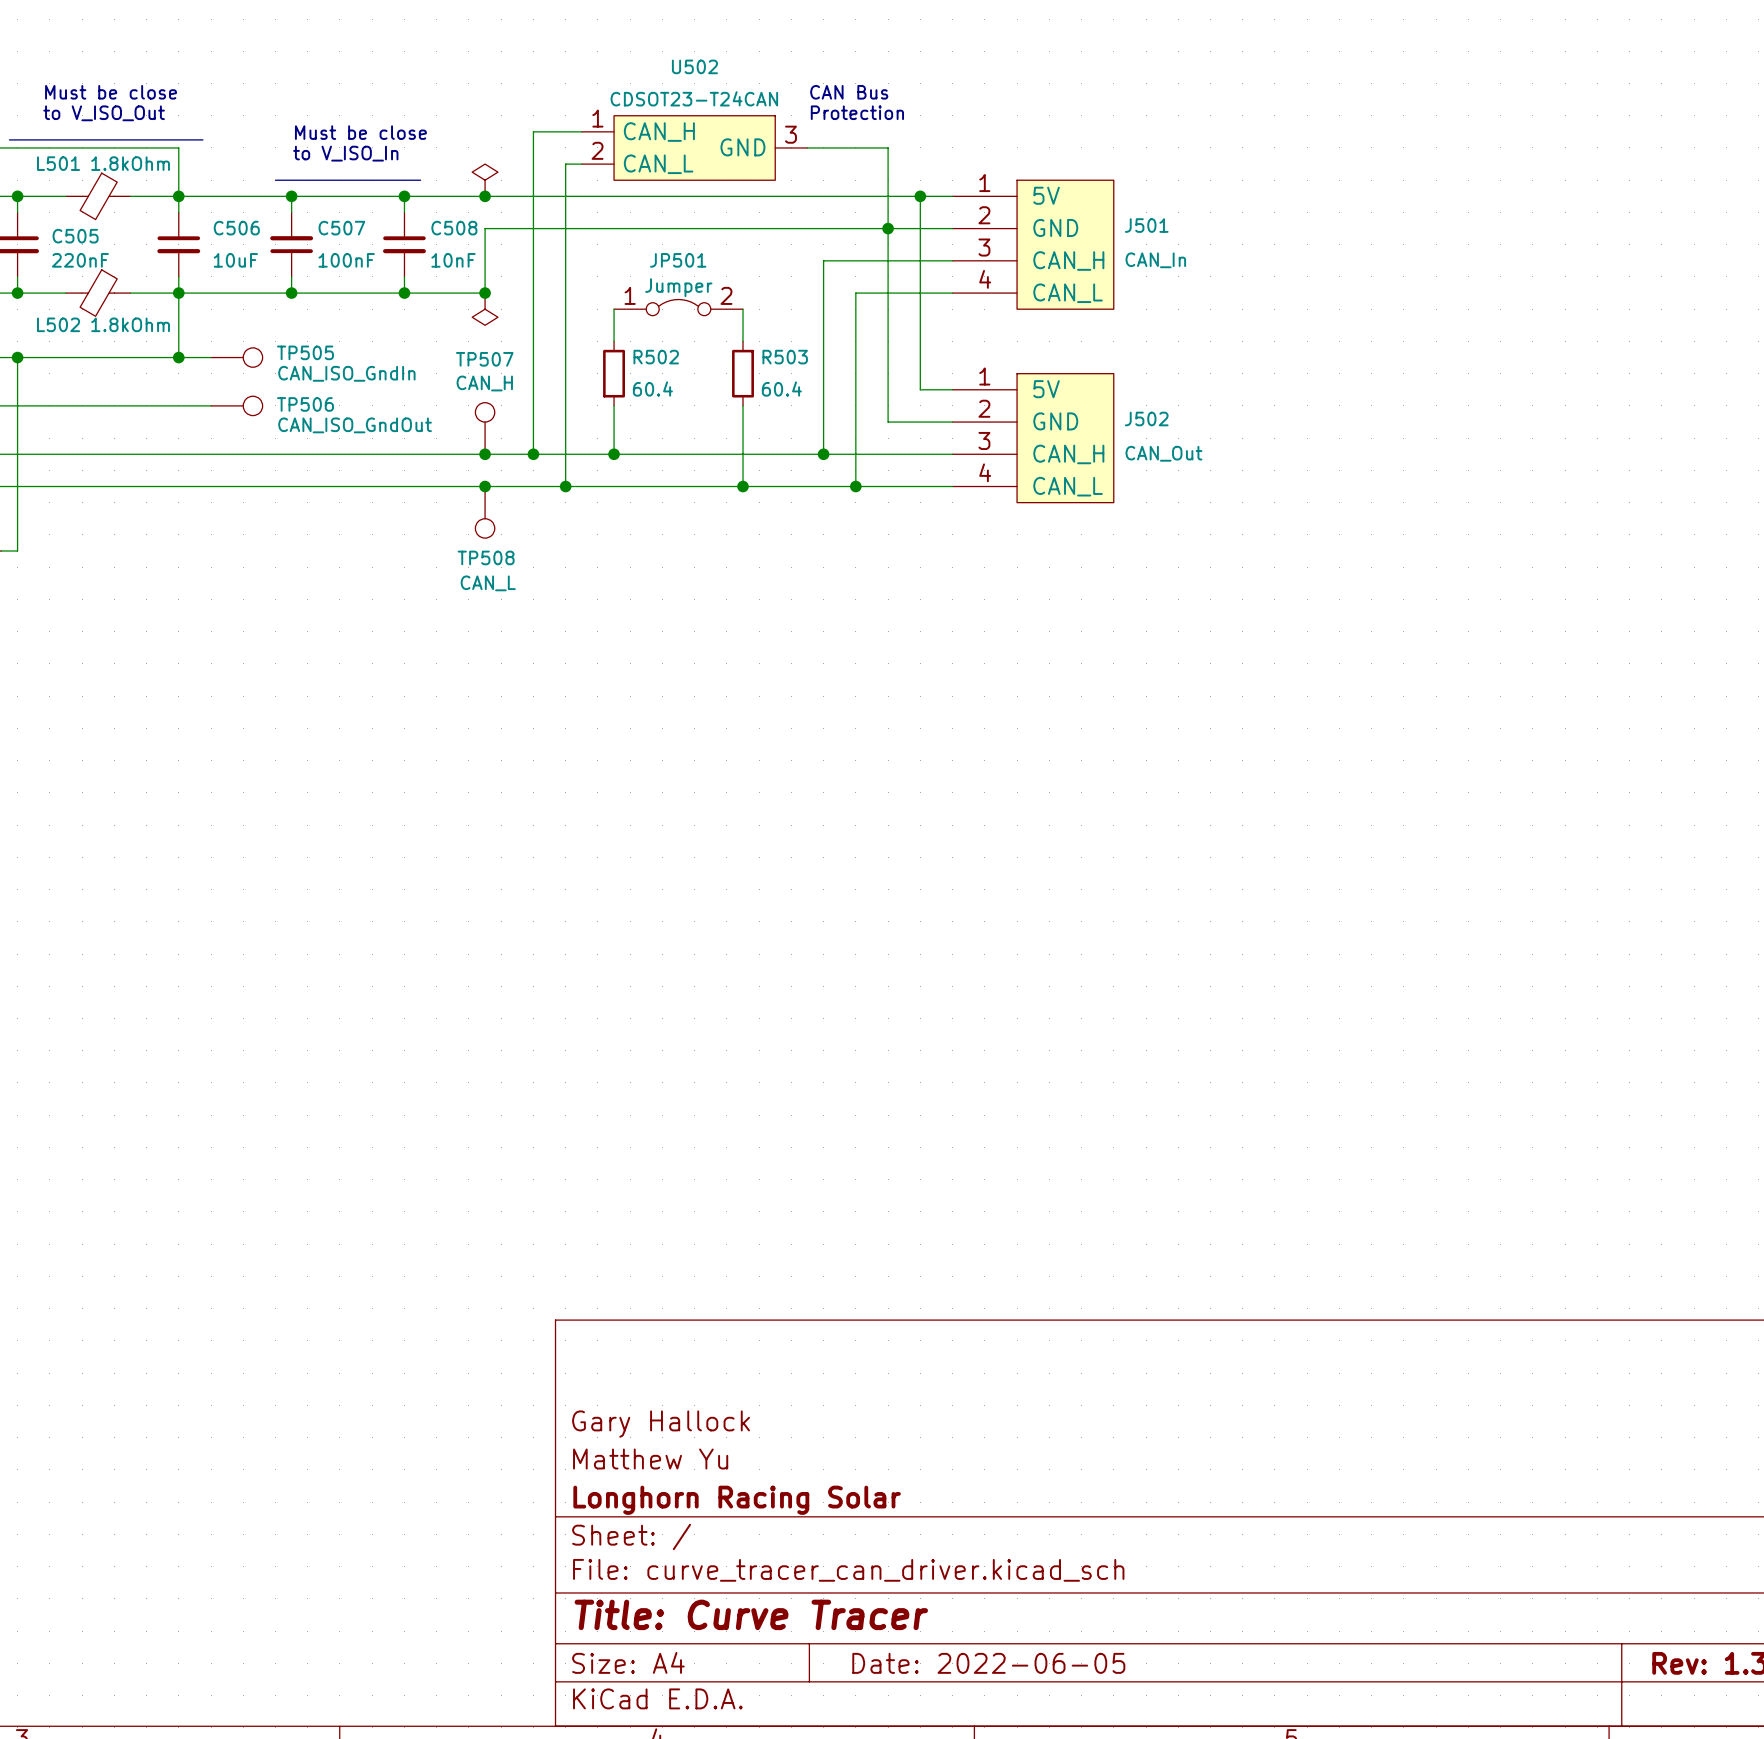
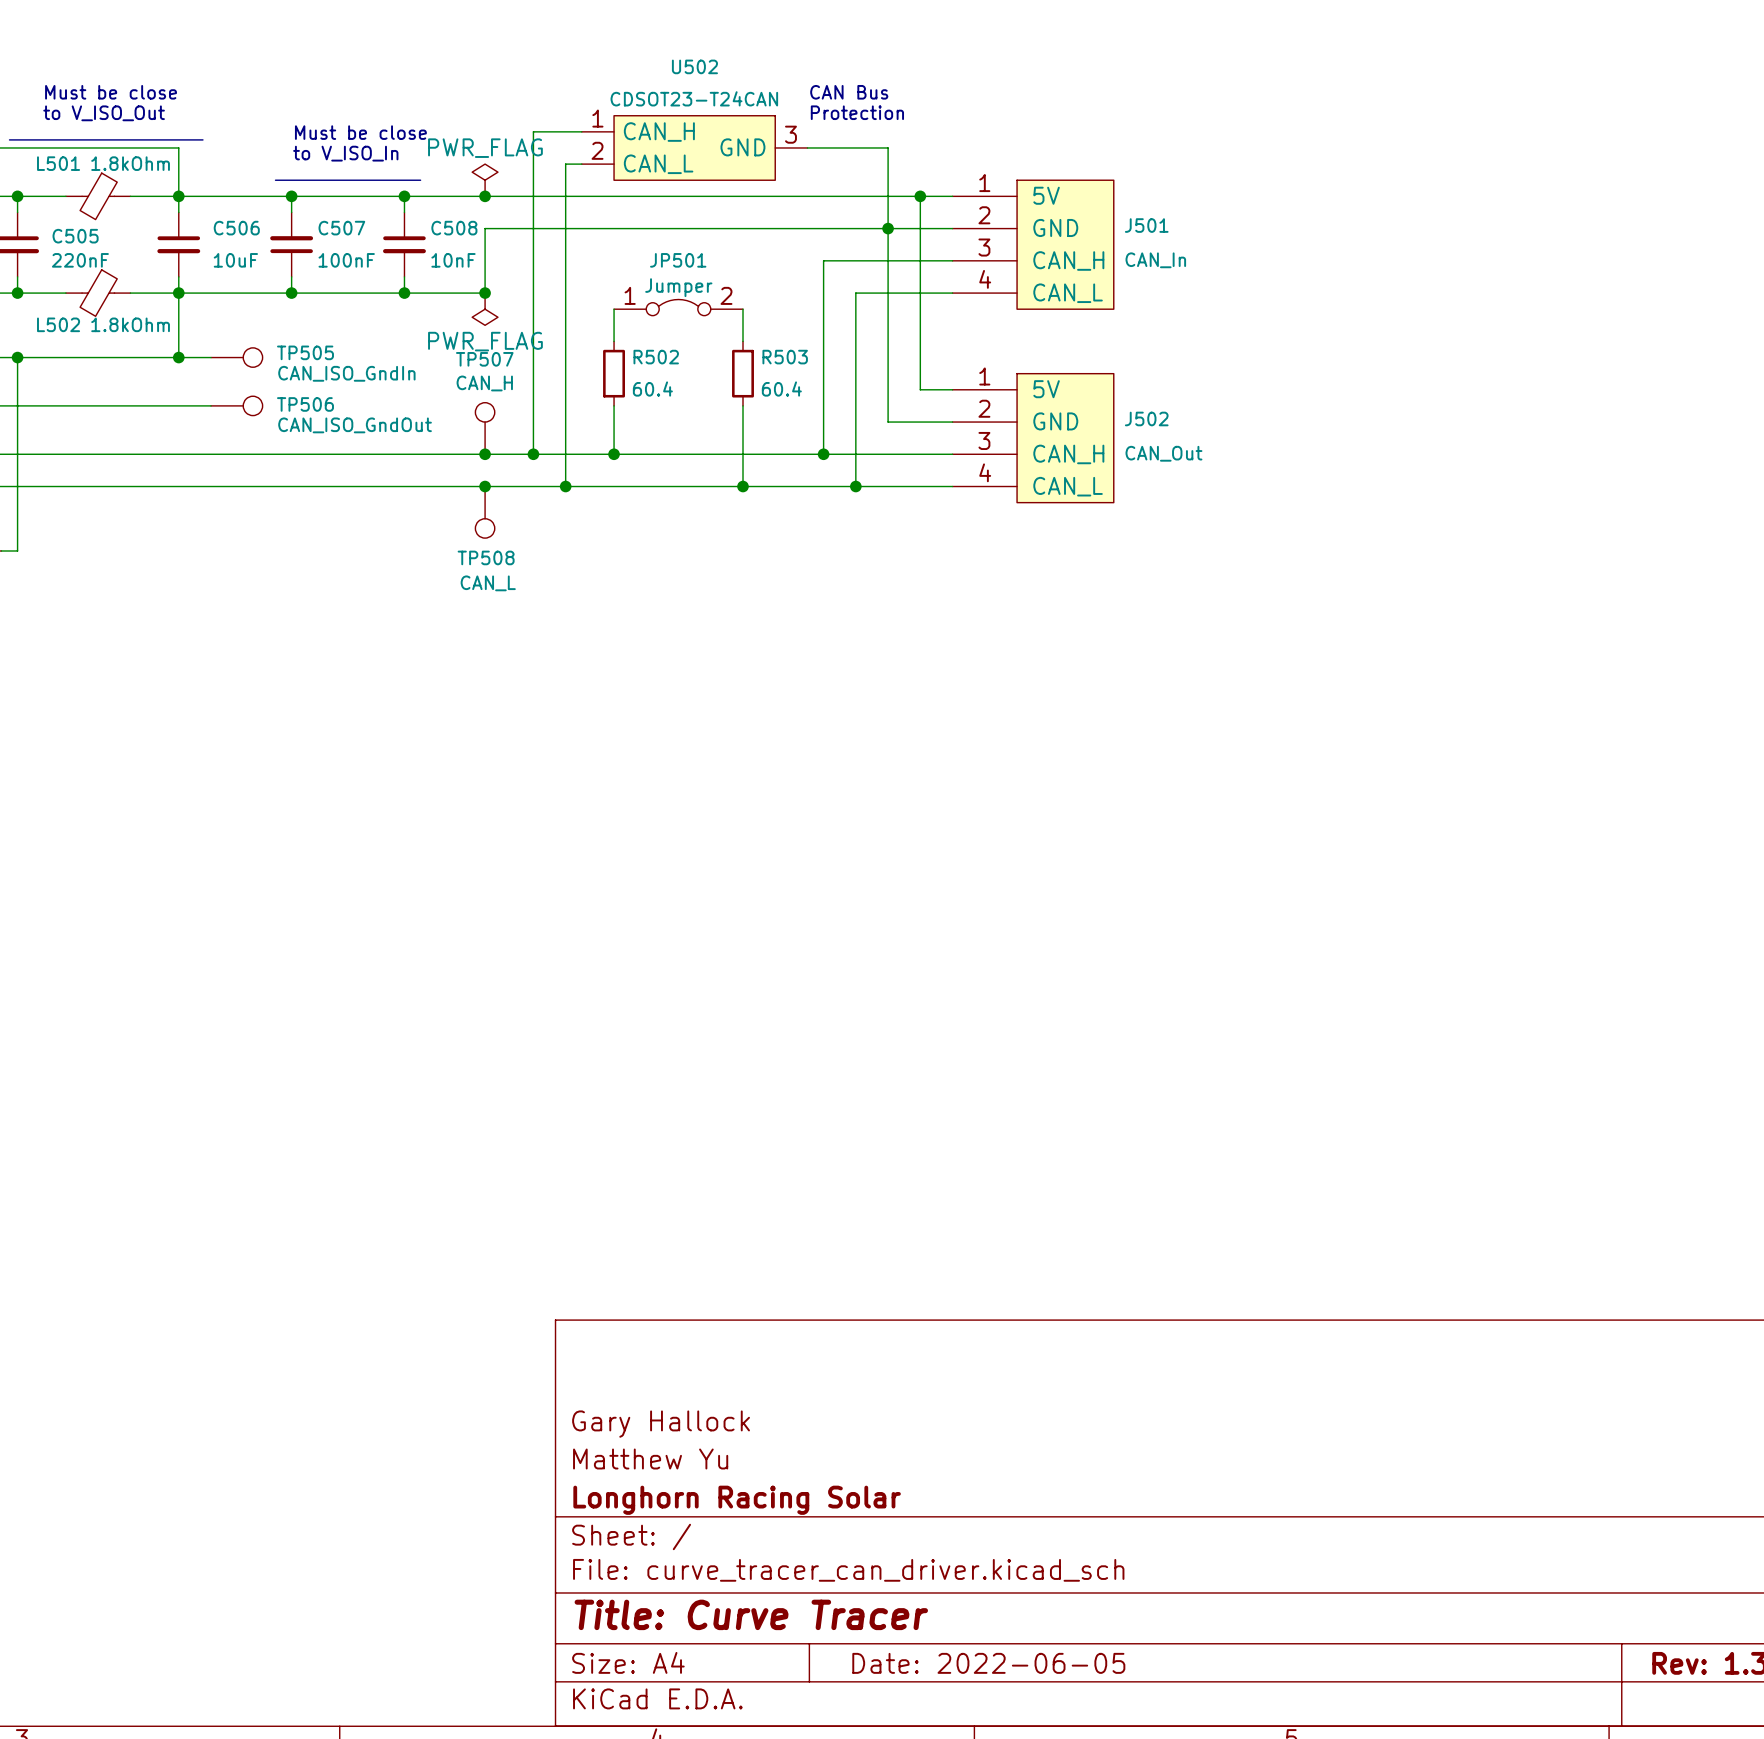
power symbol text: none -> PWR_FLAG (485, 148)
power symbol text: none -> PWR_FLAG (485, 341)

